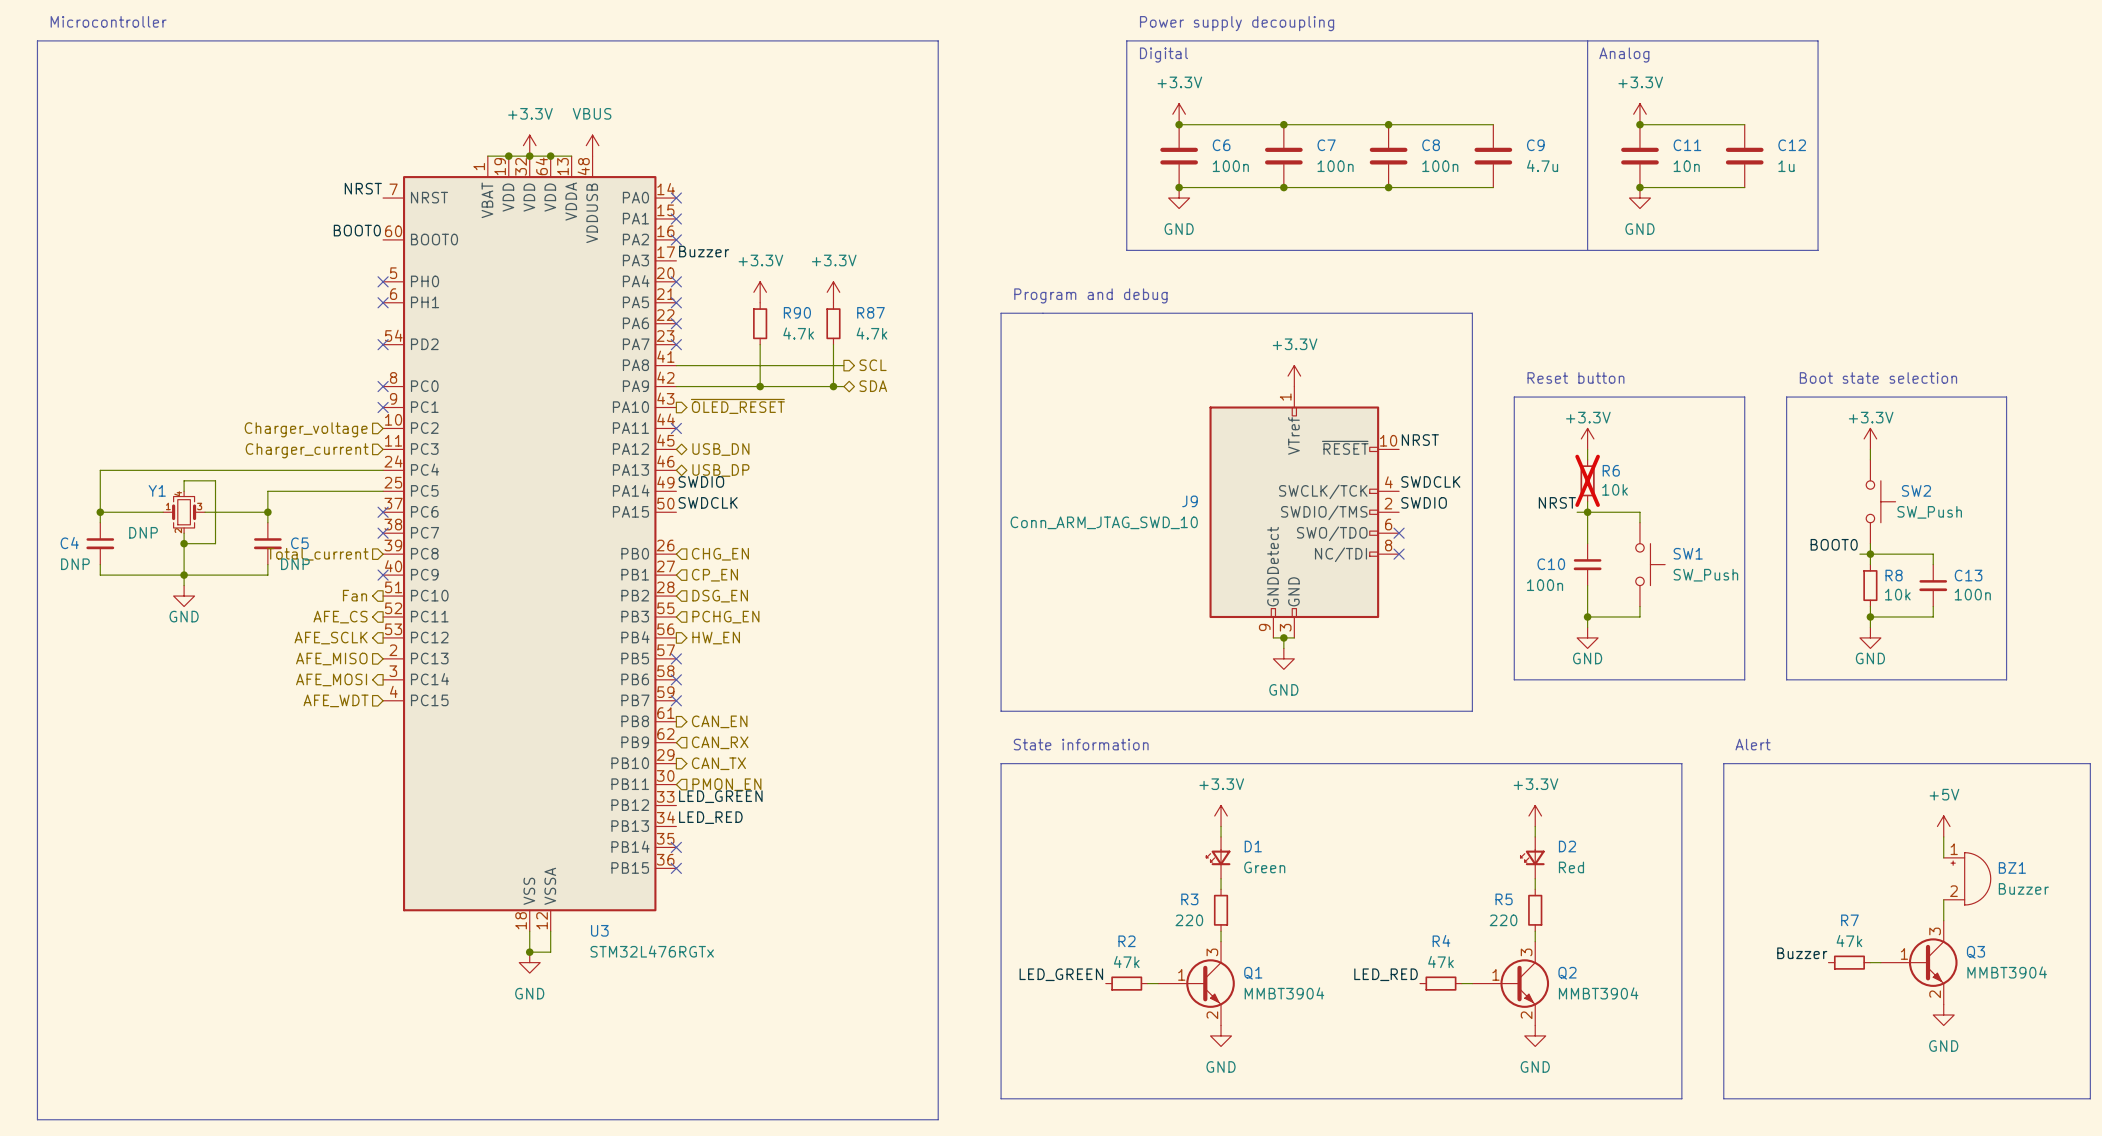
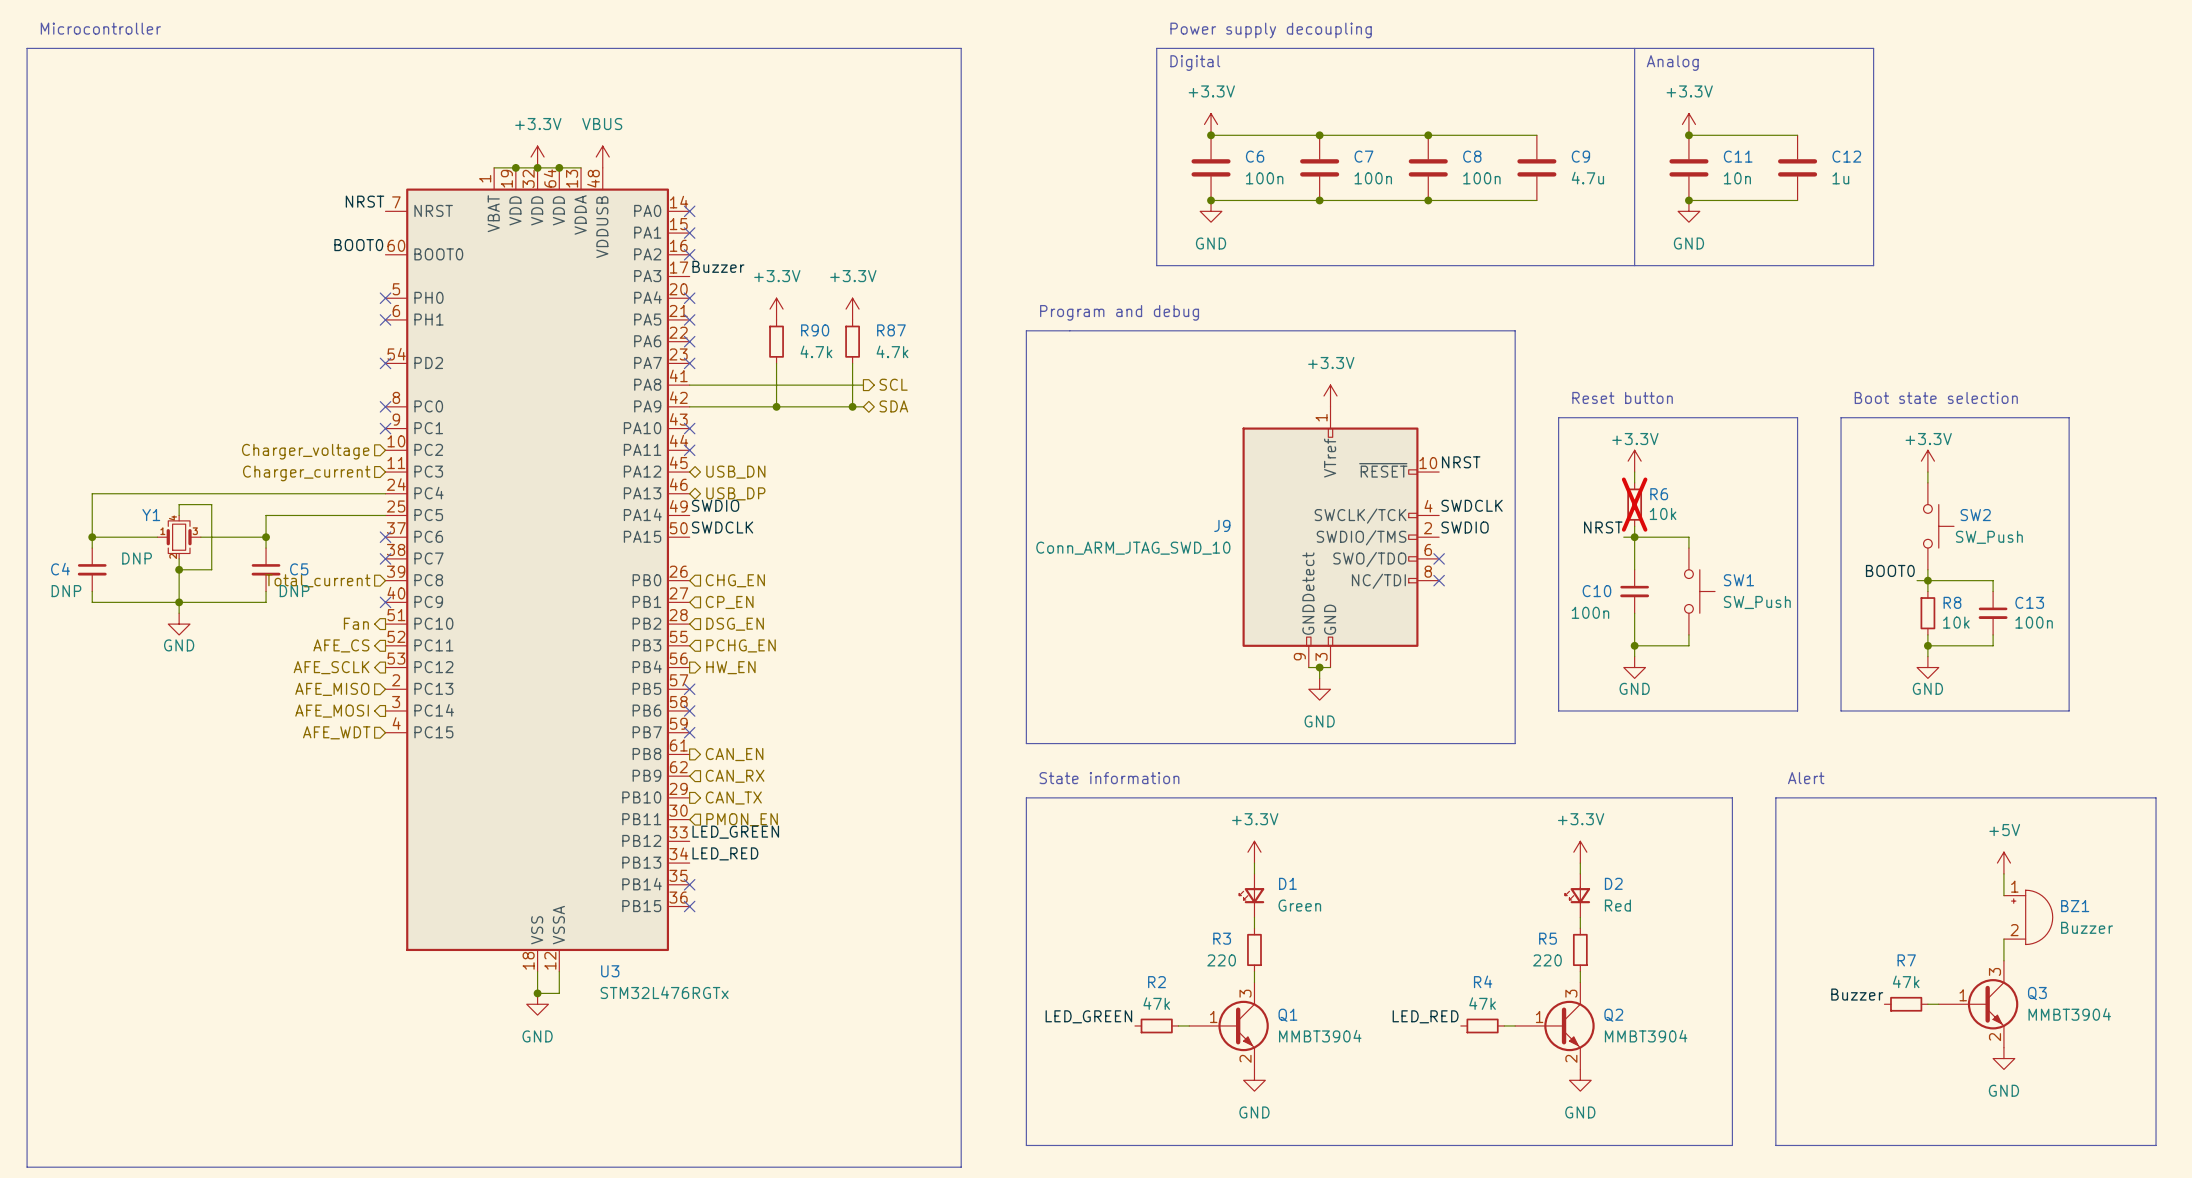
hierarchical label: ~{OLED_RESET} (737, 406) -> none
no-connect mark: none -> (689, 428)

